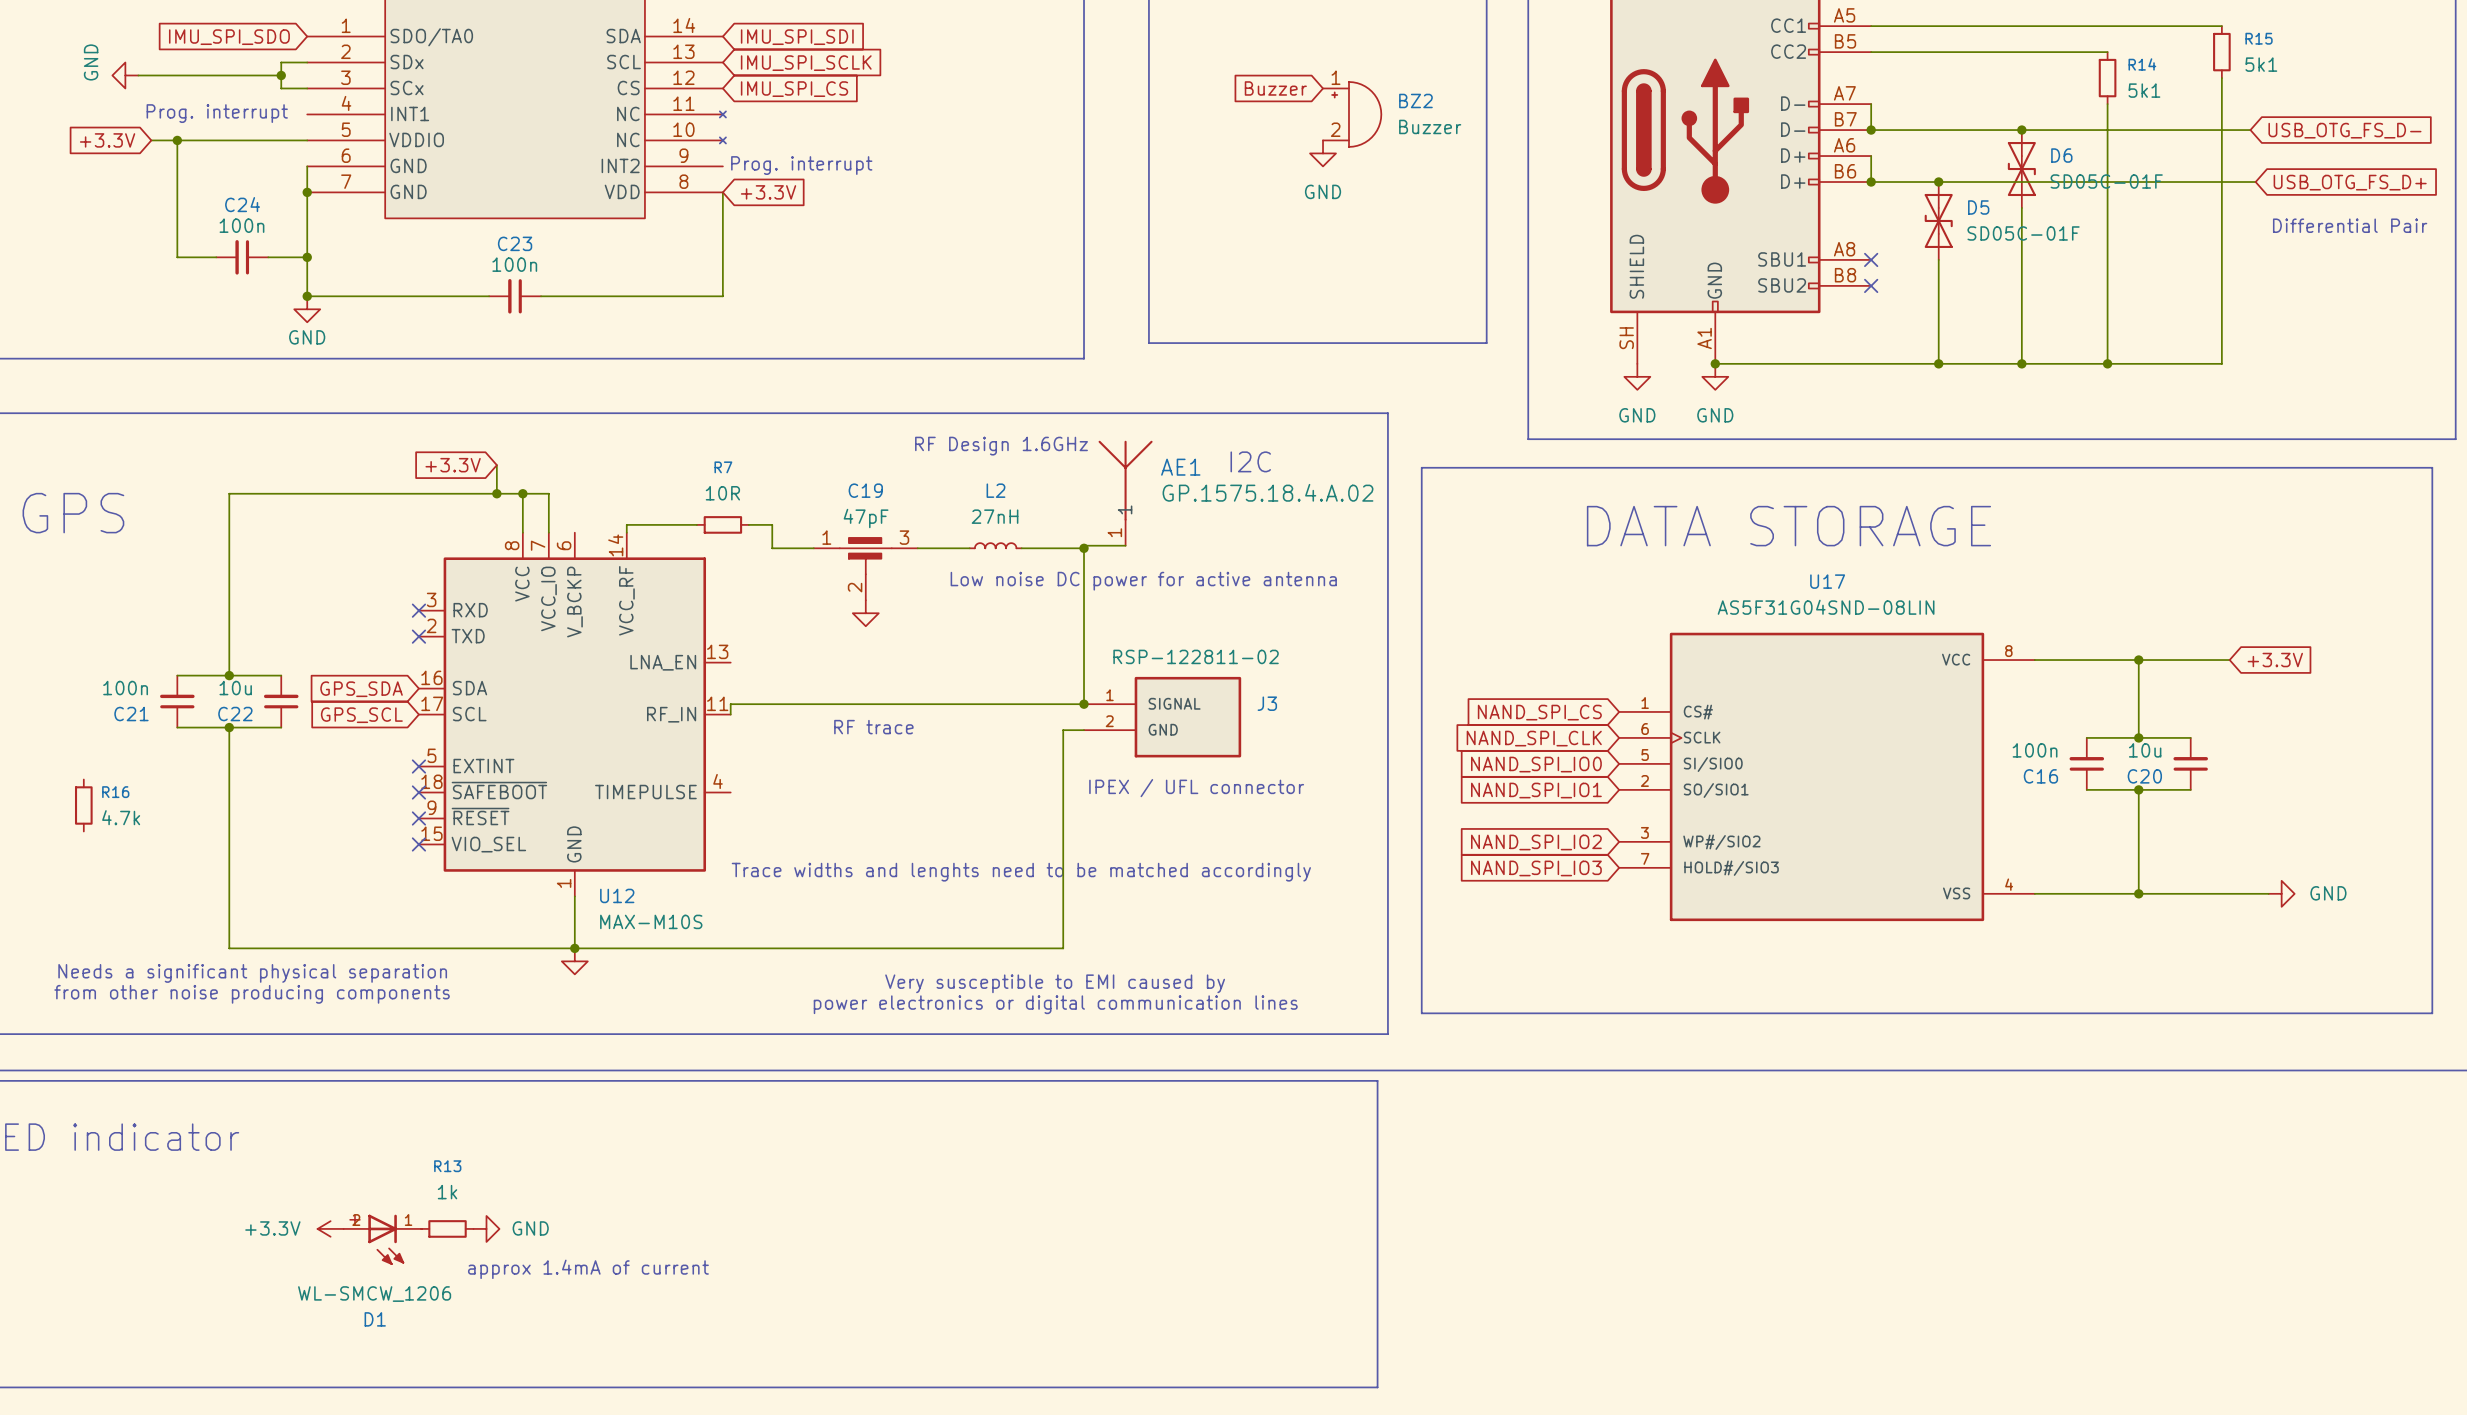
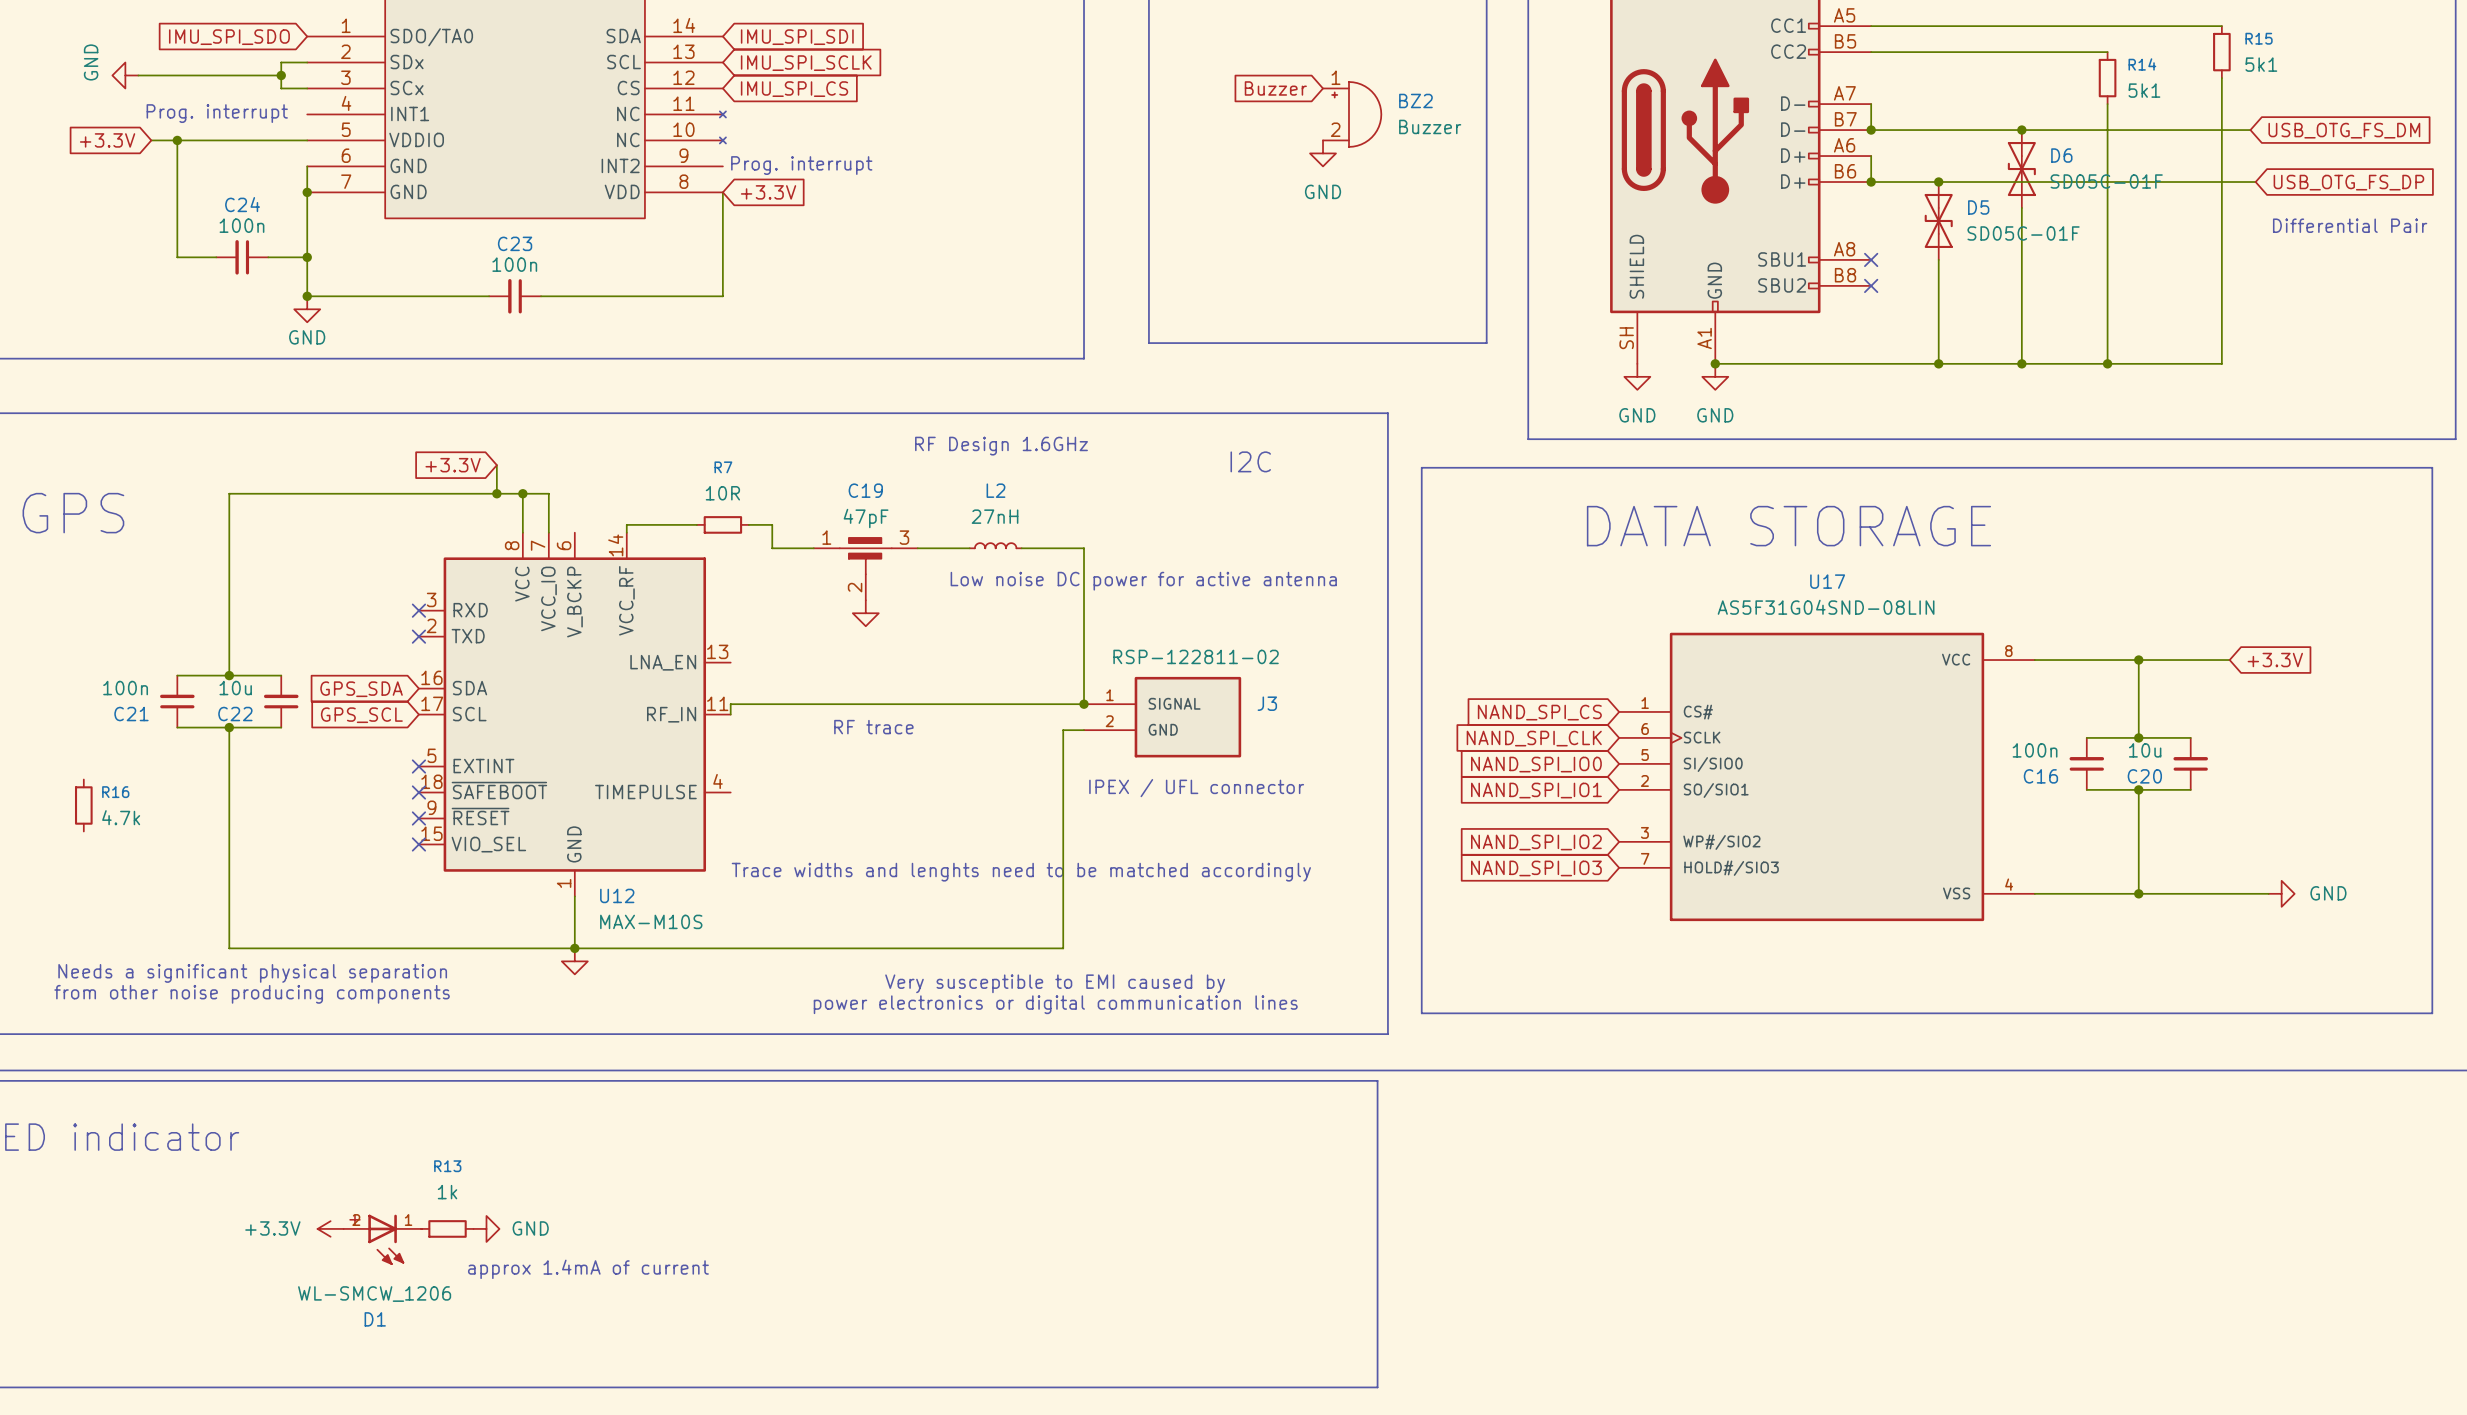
global label: USB_OTG_FS_D- (2344, 130) -> USB_OTG_FS_DM (2344, 130)
global label: USB_OTG_FS_D+ (2350, 182) -> USB_OTG_FS_DP (2348, 182)
AE1: GP.1575.18.4.A.02 (1125, 493) -> none
wire: (1125, 545) (1084, 545) (1084, 548) -> none
junction: (1084, 548) -> none

